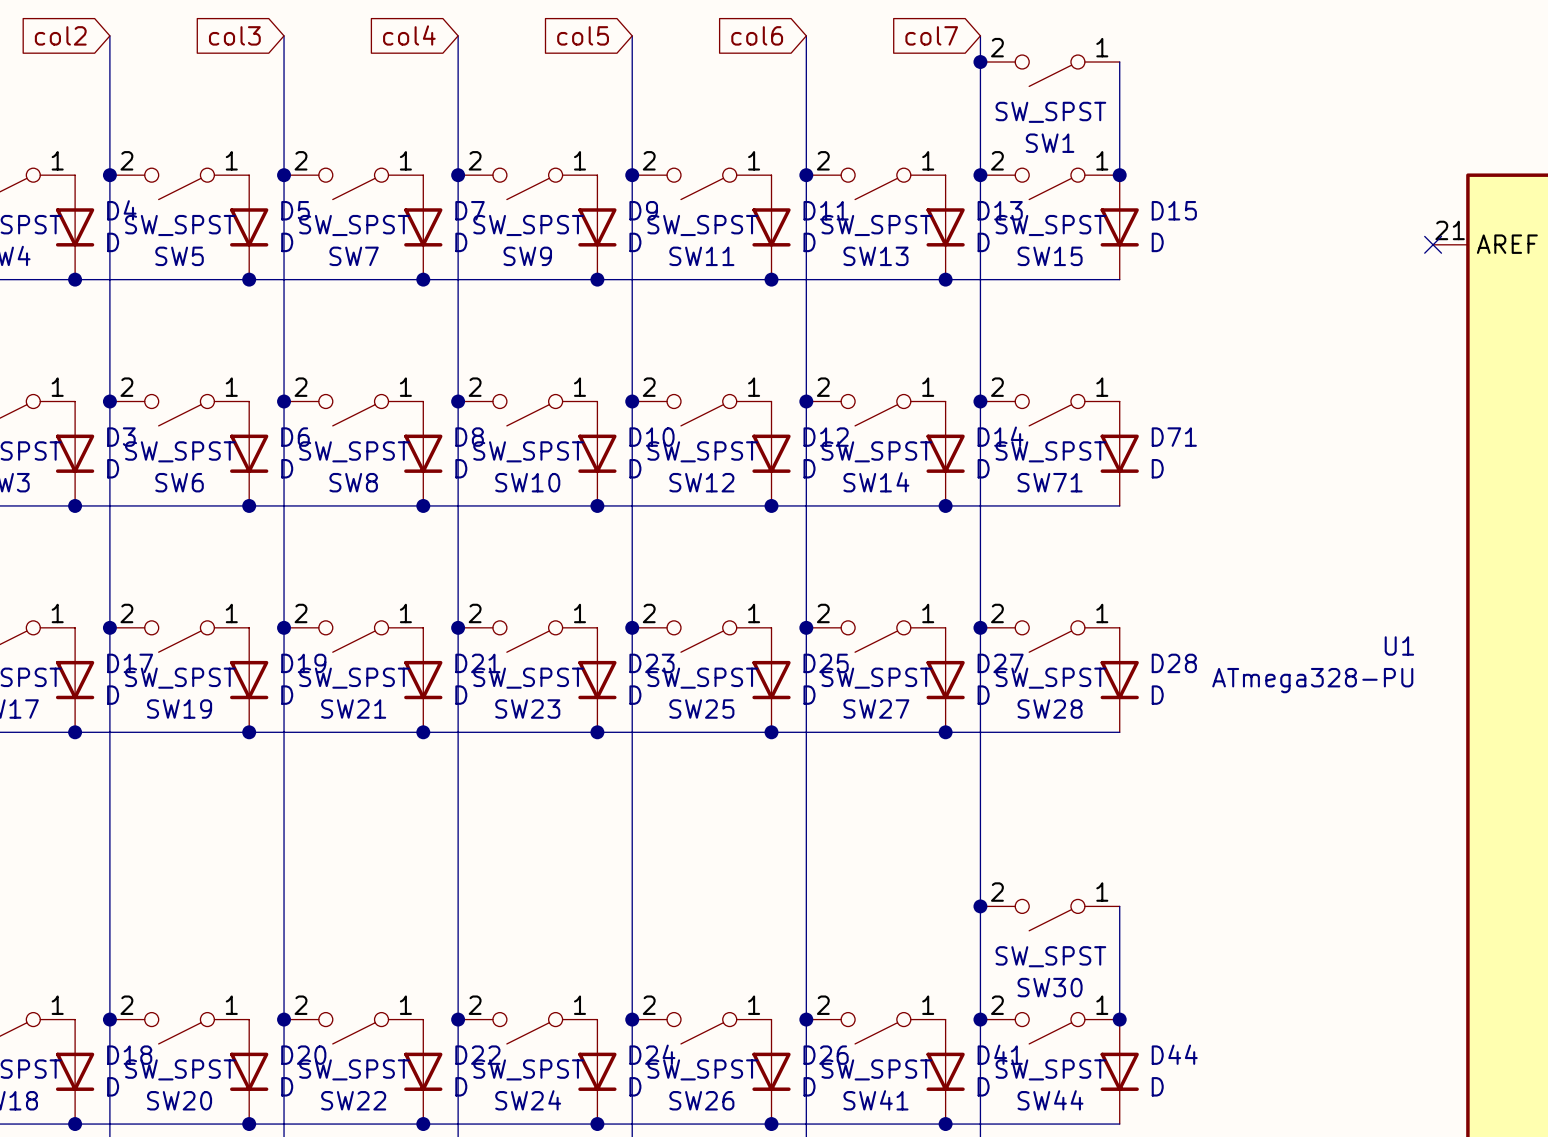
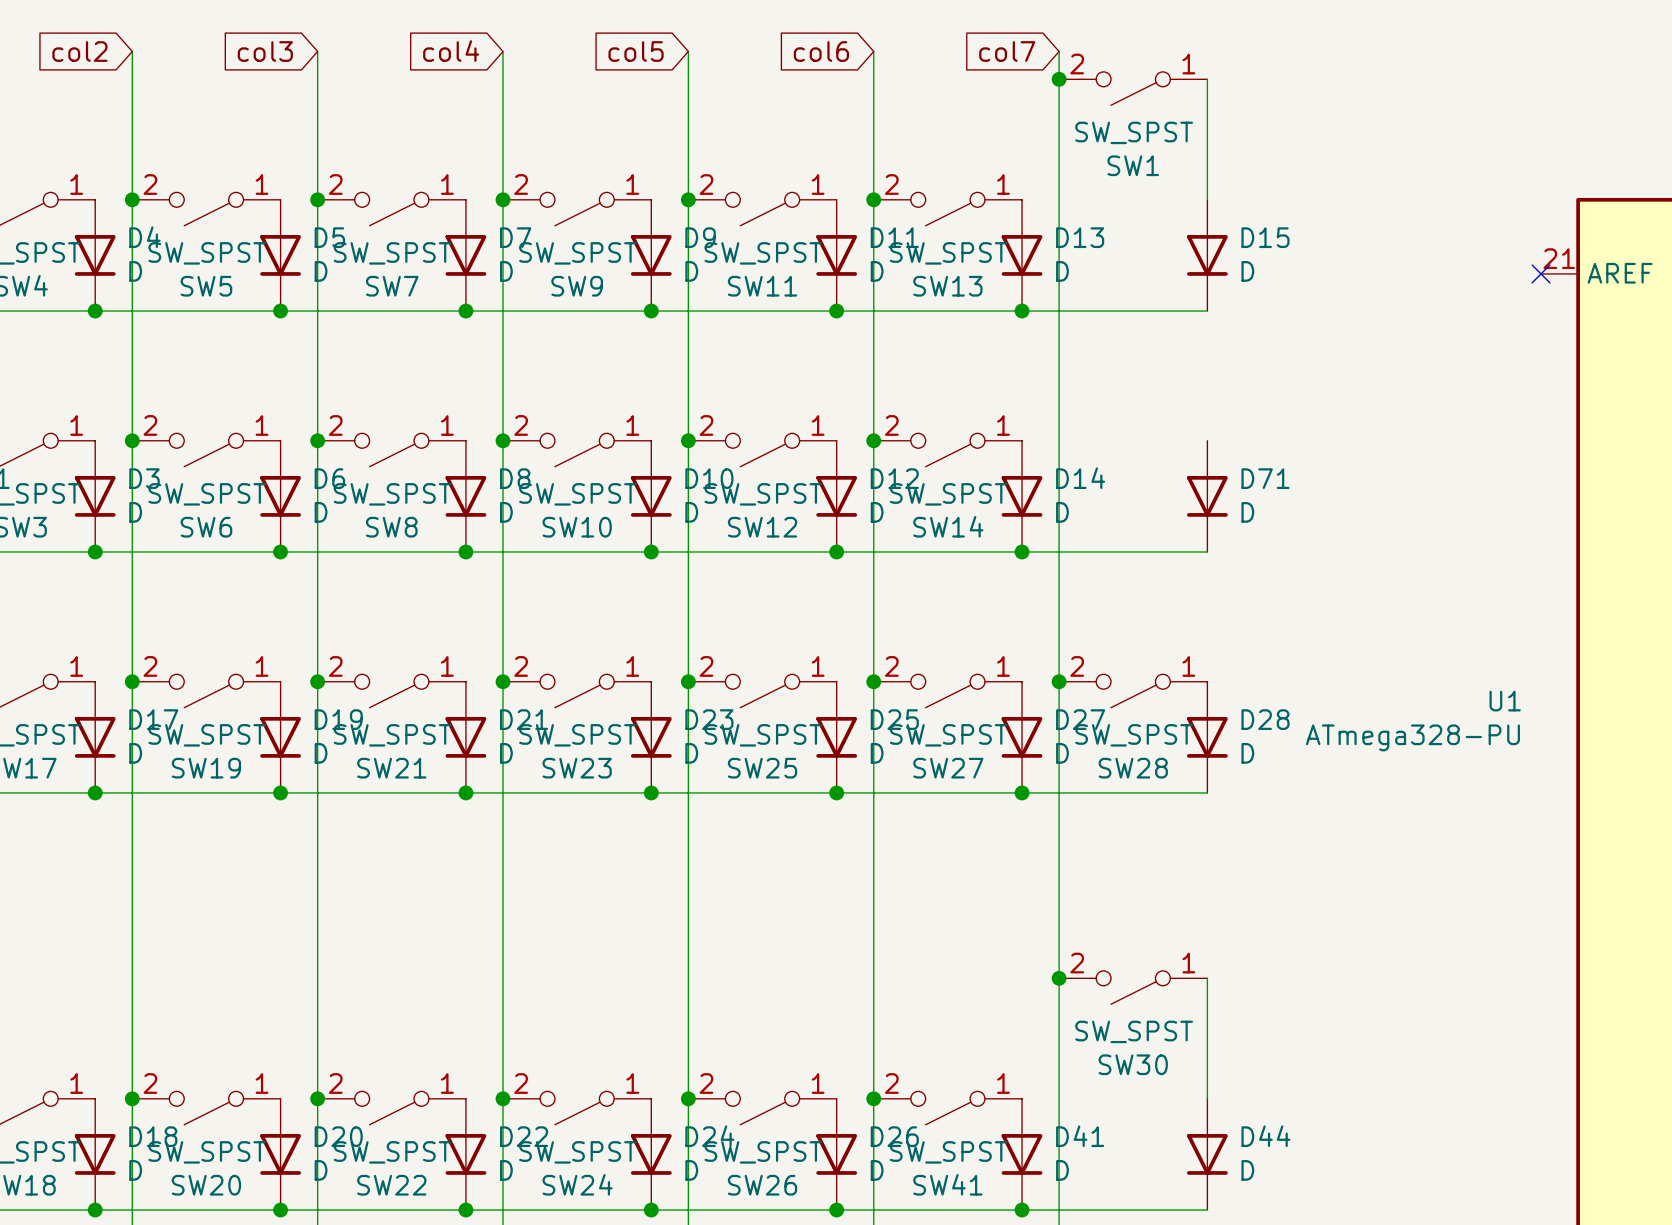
junction: (980, 175) -> none
junction: (1119, 175) -> none
SW15: SW_SPST (1050, 183) -> none
junction: (980, 401) -> none
SW71: SW_SPST (1050, 410) -> none
junction: (980, 1019) -> none
junction: (1119, 1019) -> none
SW44: SW_SPST (1050, 1028) -> none

